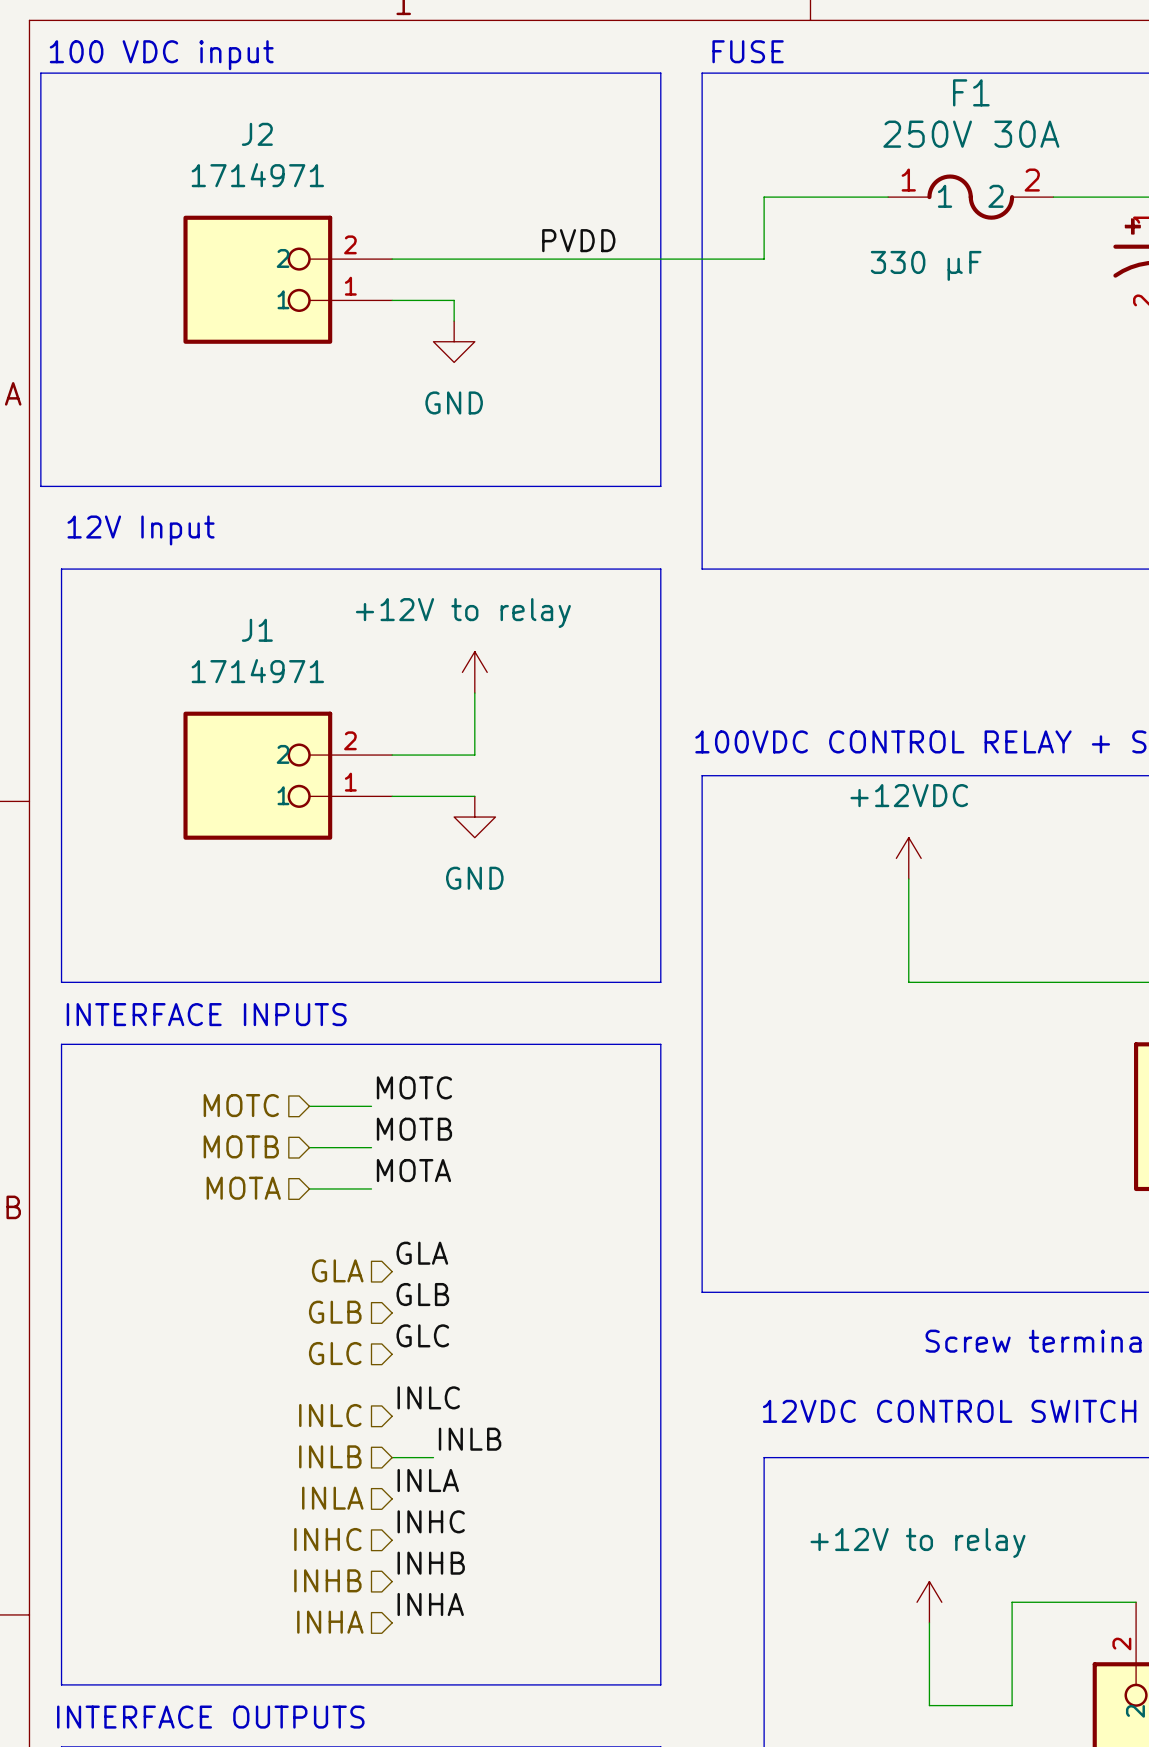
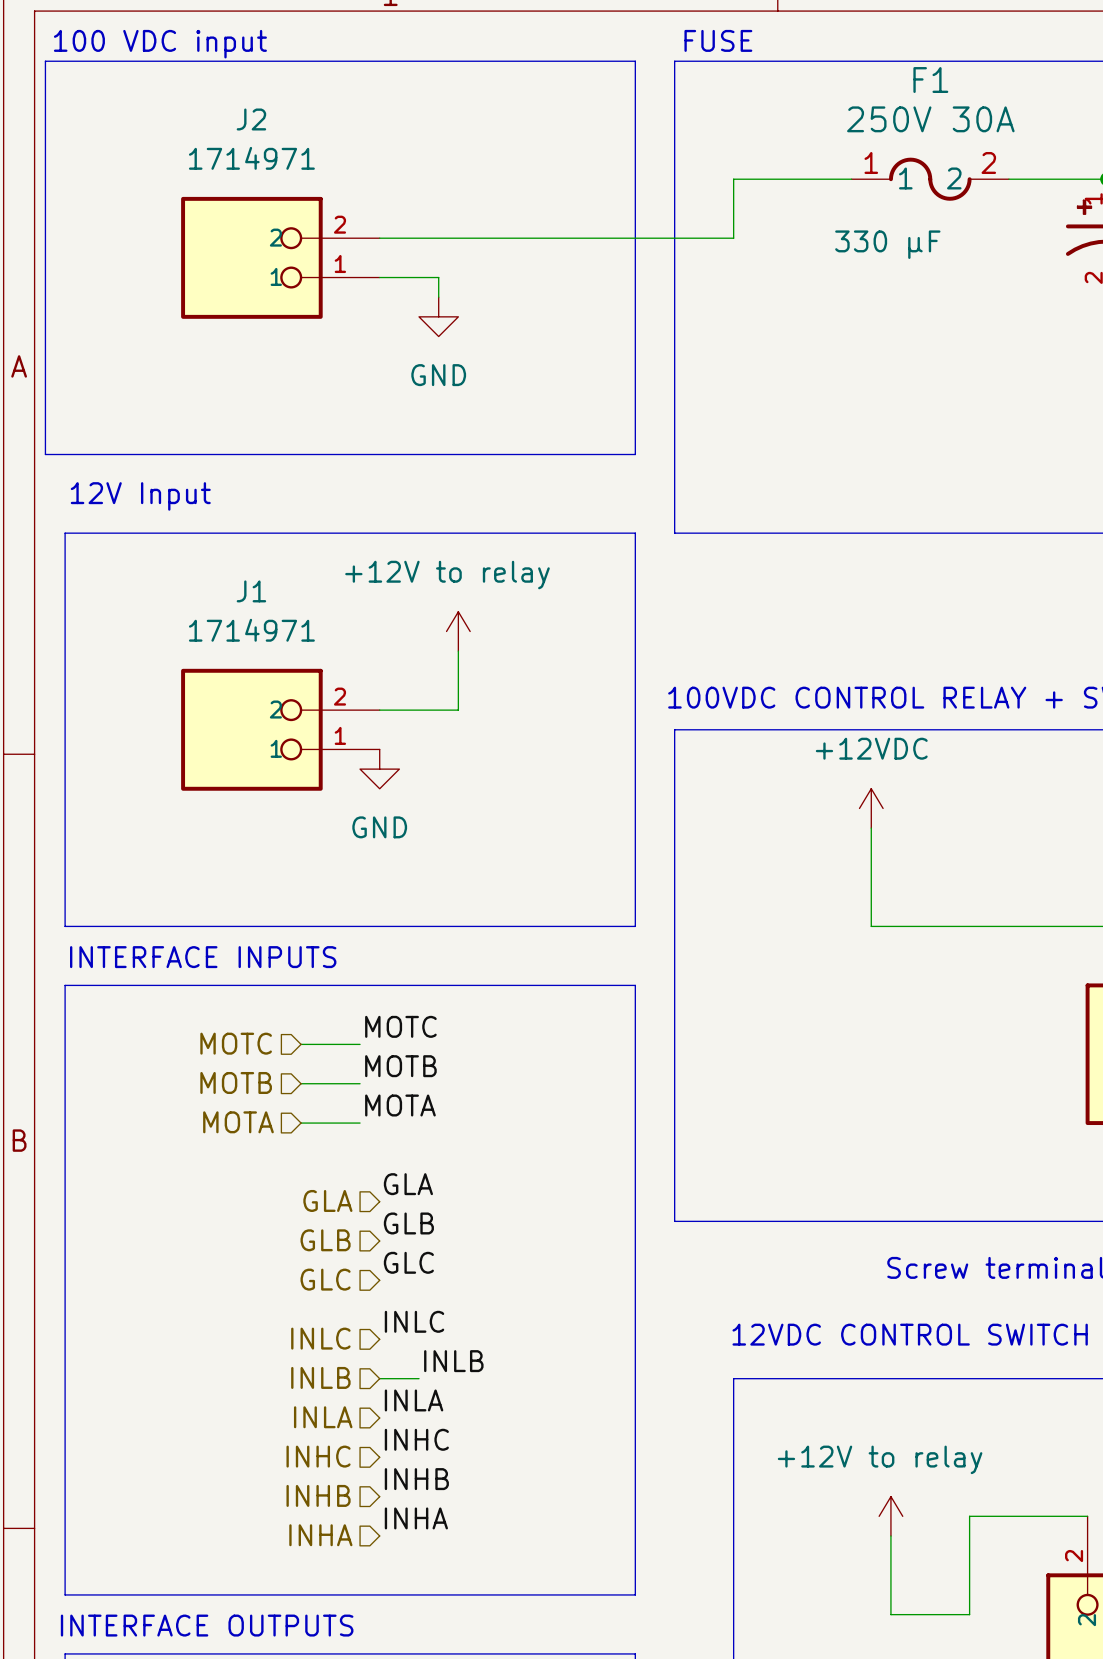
label: PVDD (578, 240) -> none
wire: (392, 796) (474, 796) -> none
power symbol position: GND (474, 817) -> GND (379, 769)

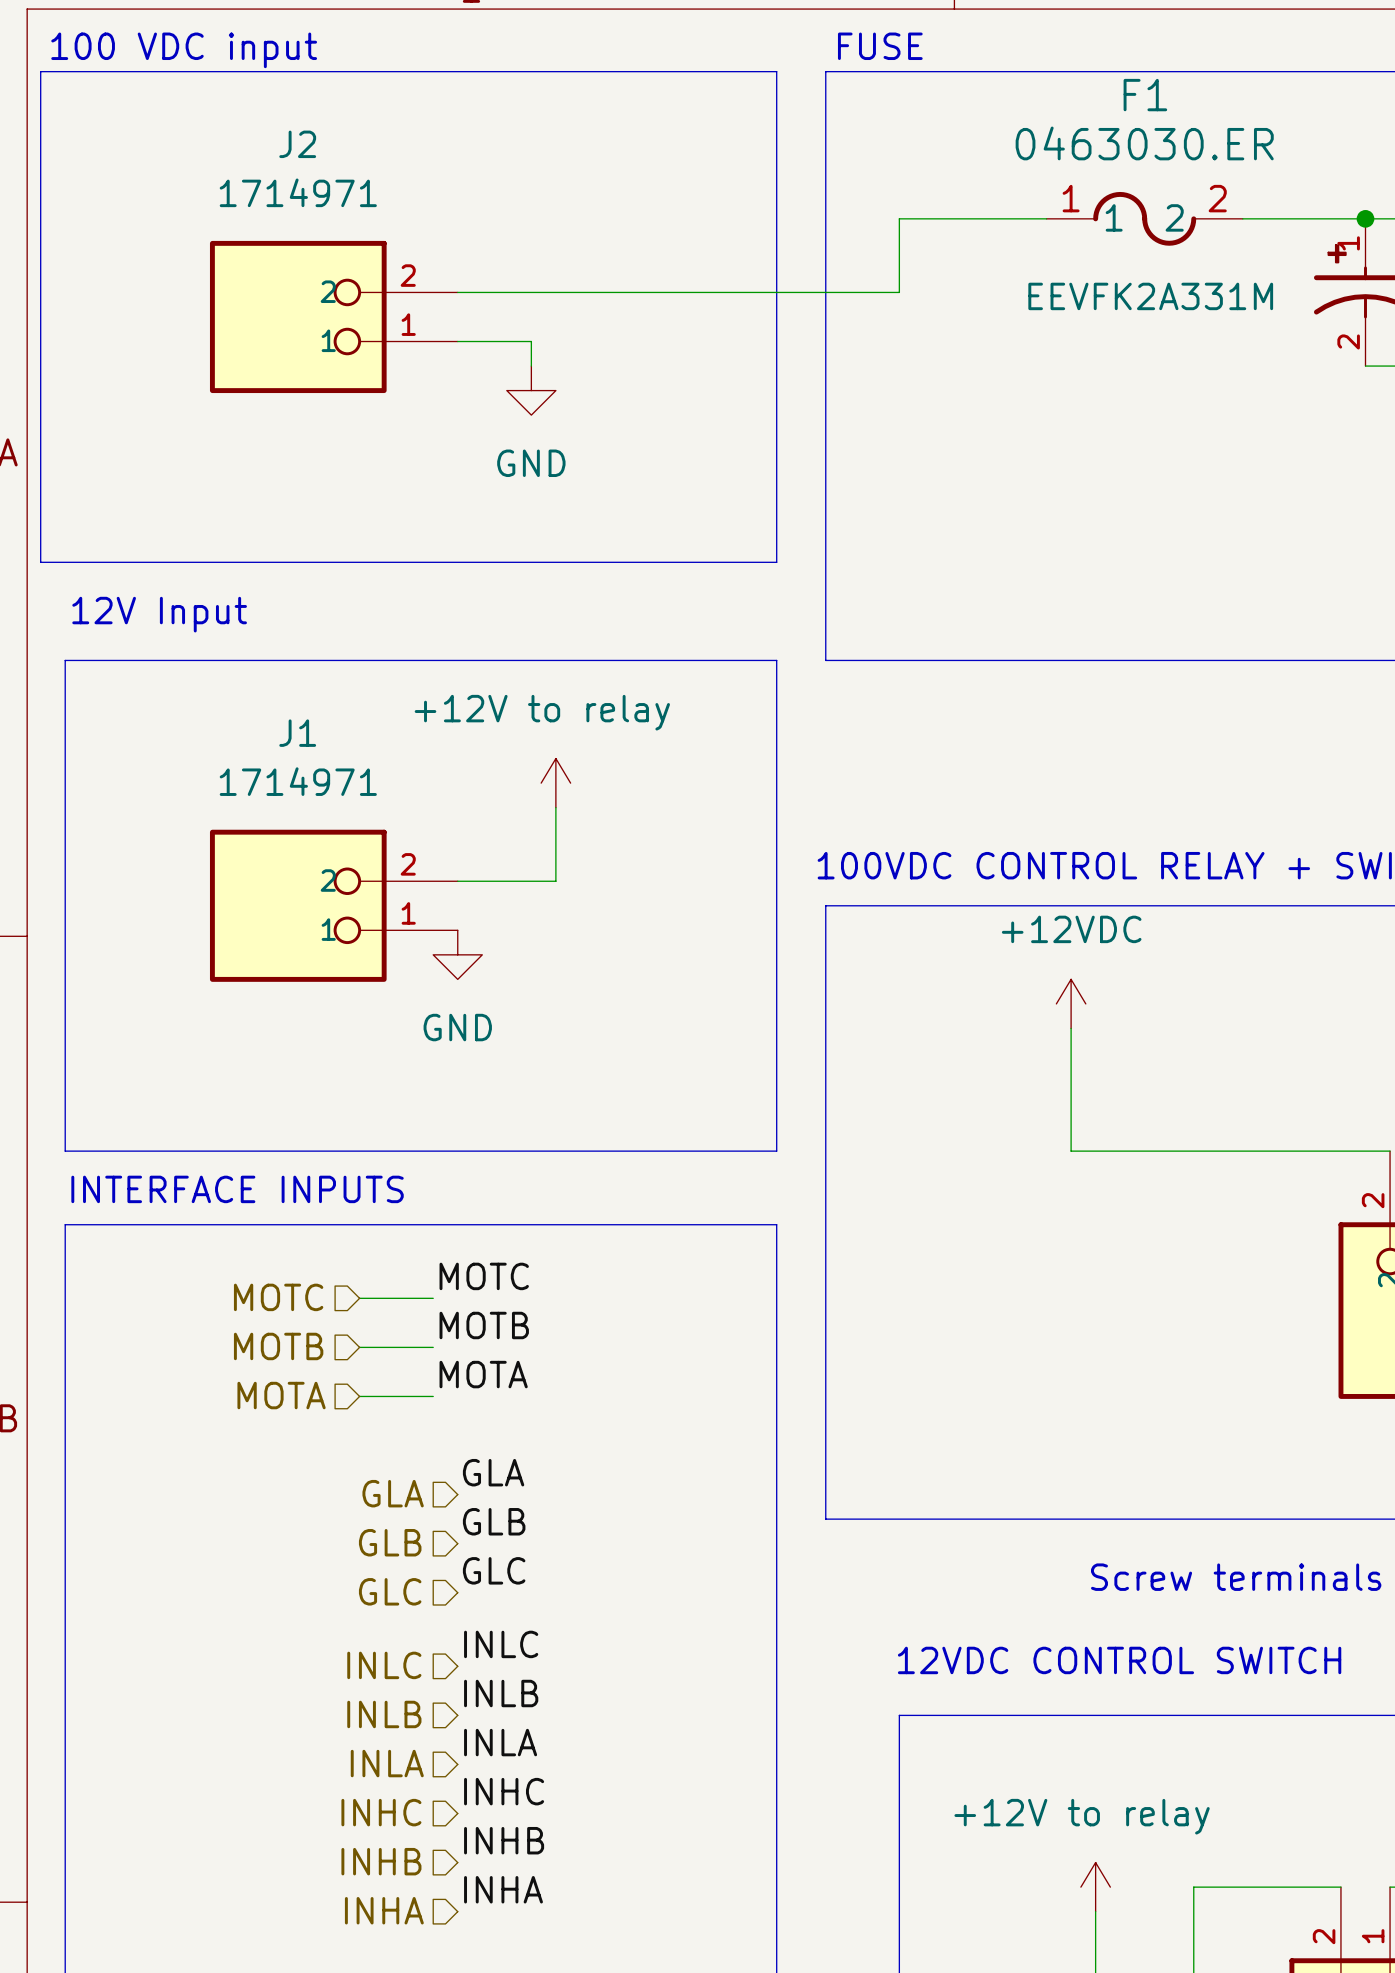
F1 value: 250V 30A (930, 119) -> 0463030.ER (1144, 143)
part value: 330 µF (887, 244) -> EEVFK2A331M (1150, 296)
label position: INLB (453, 1361) -> INLB (501, 1693)
wire: (379, 1378) (419, 1378) -> none

